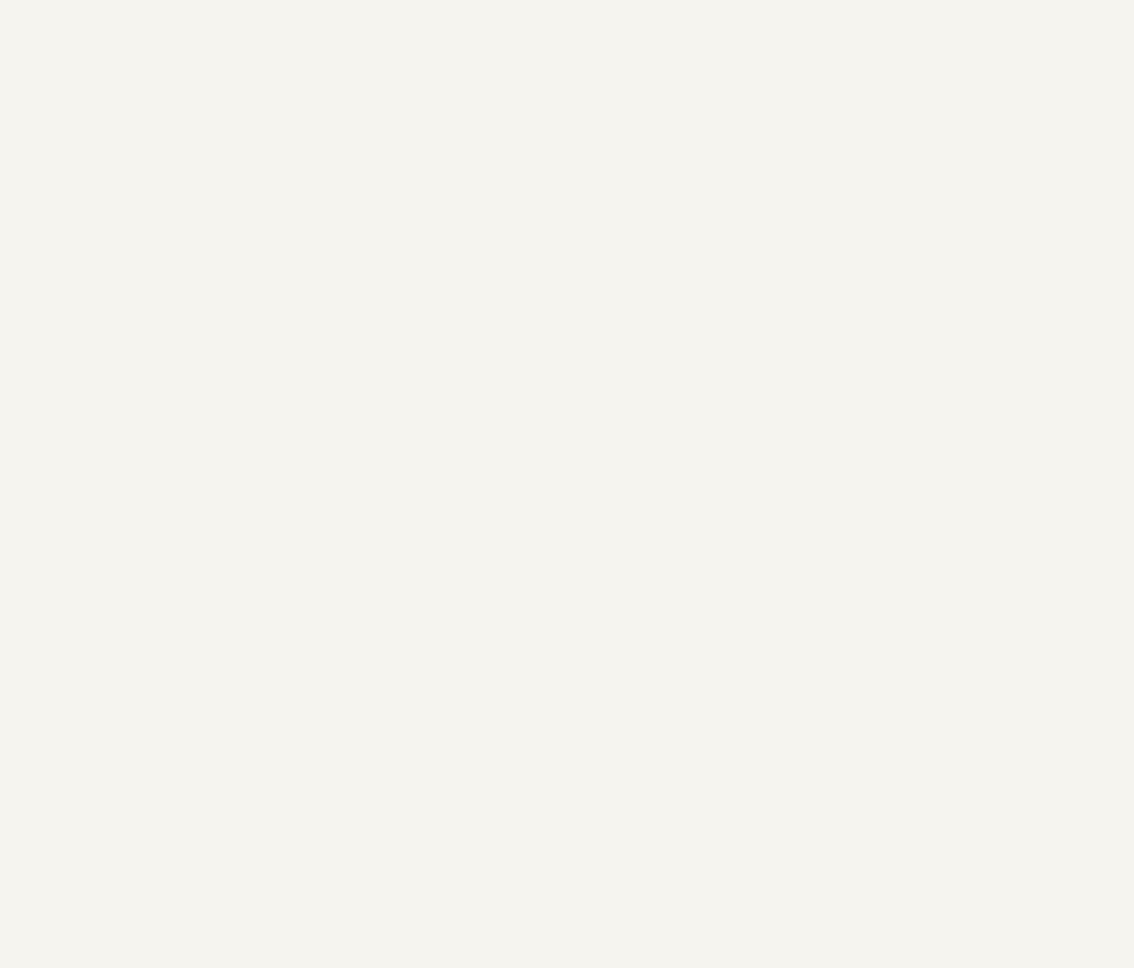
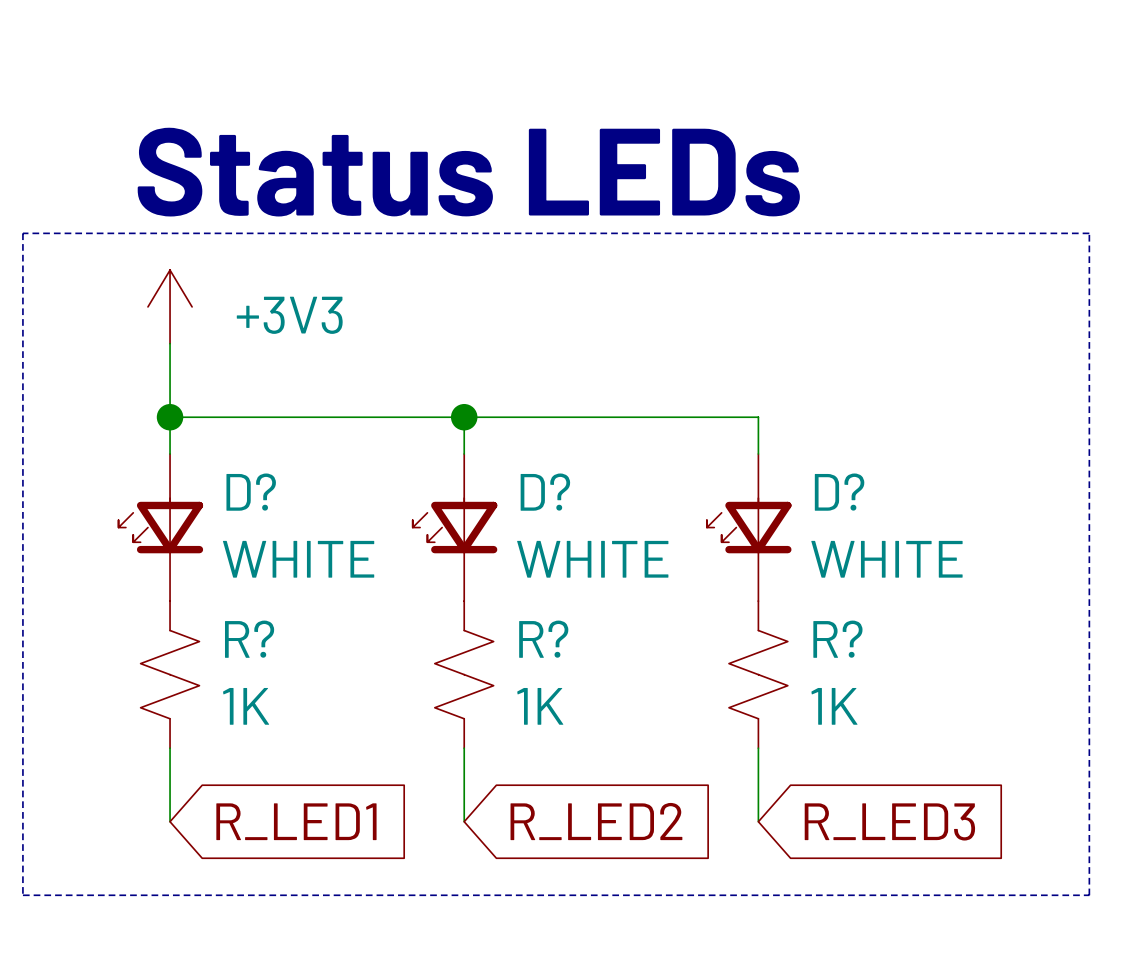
text: none -> Status LEDs (468, 172)
line: none -> (22, 233) (22, 895) (1089, 895) (1089, 233) (22, 233)
power symbol: none -> +3V3 (170, 306)
wire: none -> (170, 343) (170, 454)
wire: none -> (170, 417) (758, 417) (758, 454)
junction: none -> (170, 417)
wire: none -> (464, 417) (464, 454)
junction: none -> (464, 417)
D?: none -> WHITE (160, 527)
D?: none -> WHITE (455, 527)
D?: none -> WHITE (749, 527)
R?: none -> 1K (170, 674)
R?: none -> 1K (464, 674)
R?: none -> 1K (758, 674)
wire: none -> (170, 748) (170, 821)
wire: none -> (464, 748) (464, 821)
wire: none -> (758, 748) (758, 821)
global label: none -> R_LED1 (296, 821)
global label: none -> R_LED2 (596, 821)
global label: none -> R_LED3 (889, 821)

